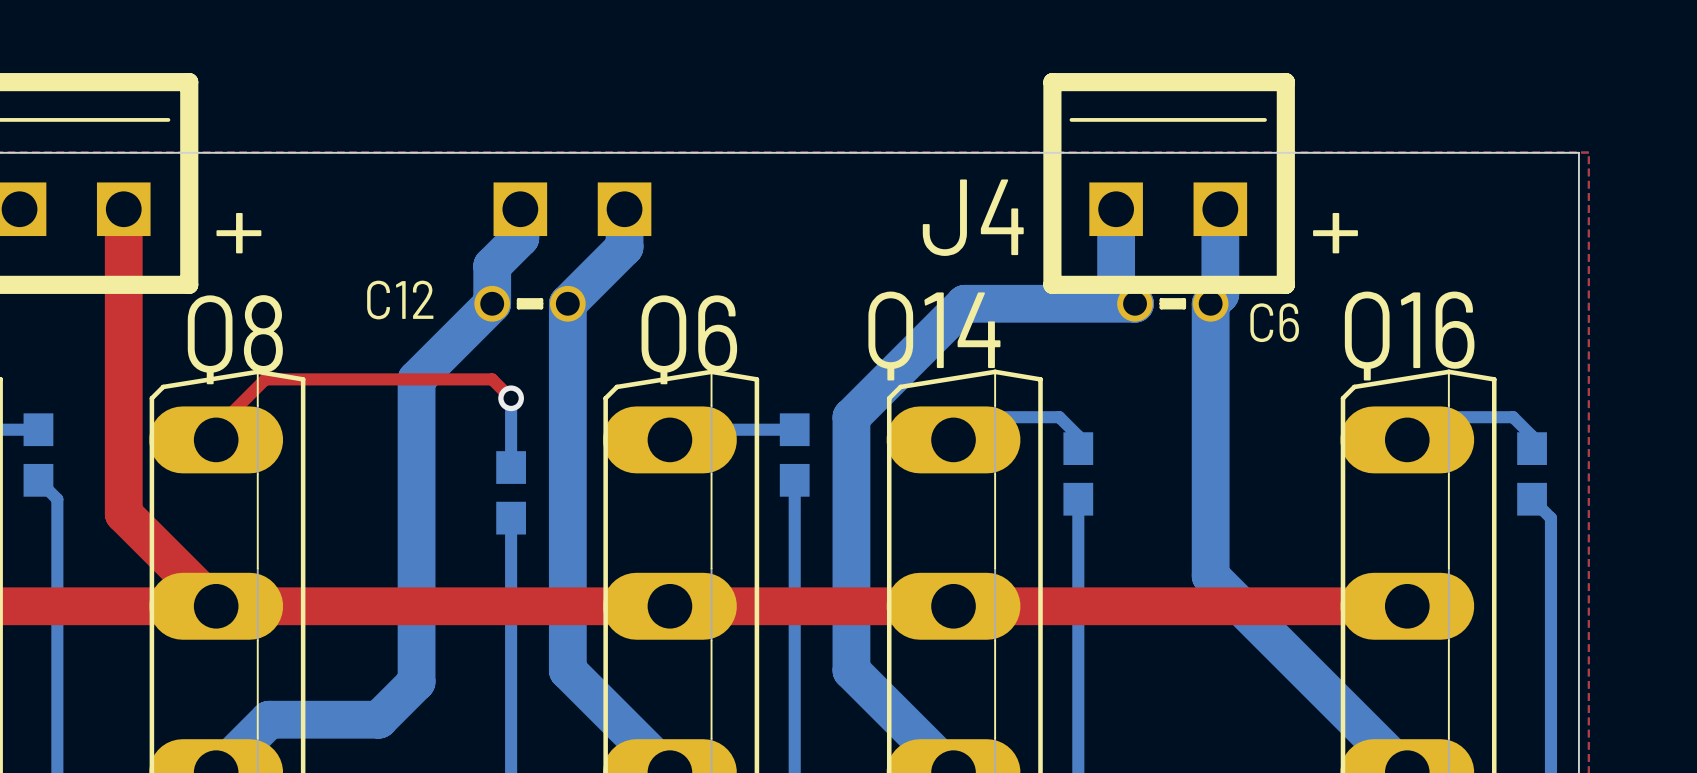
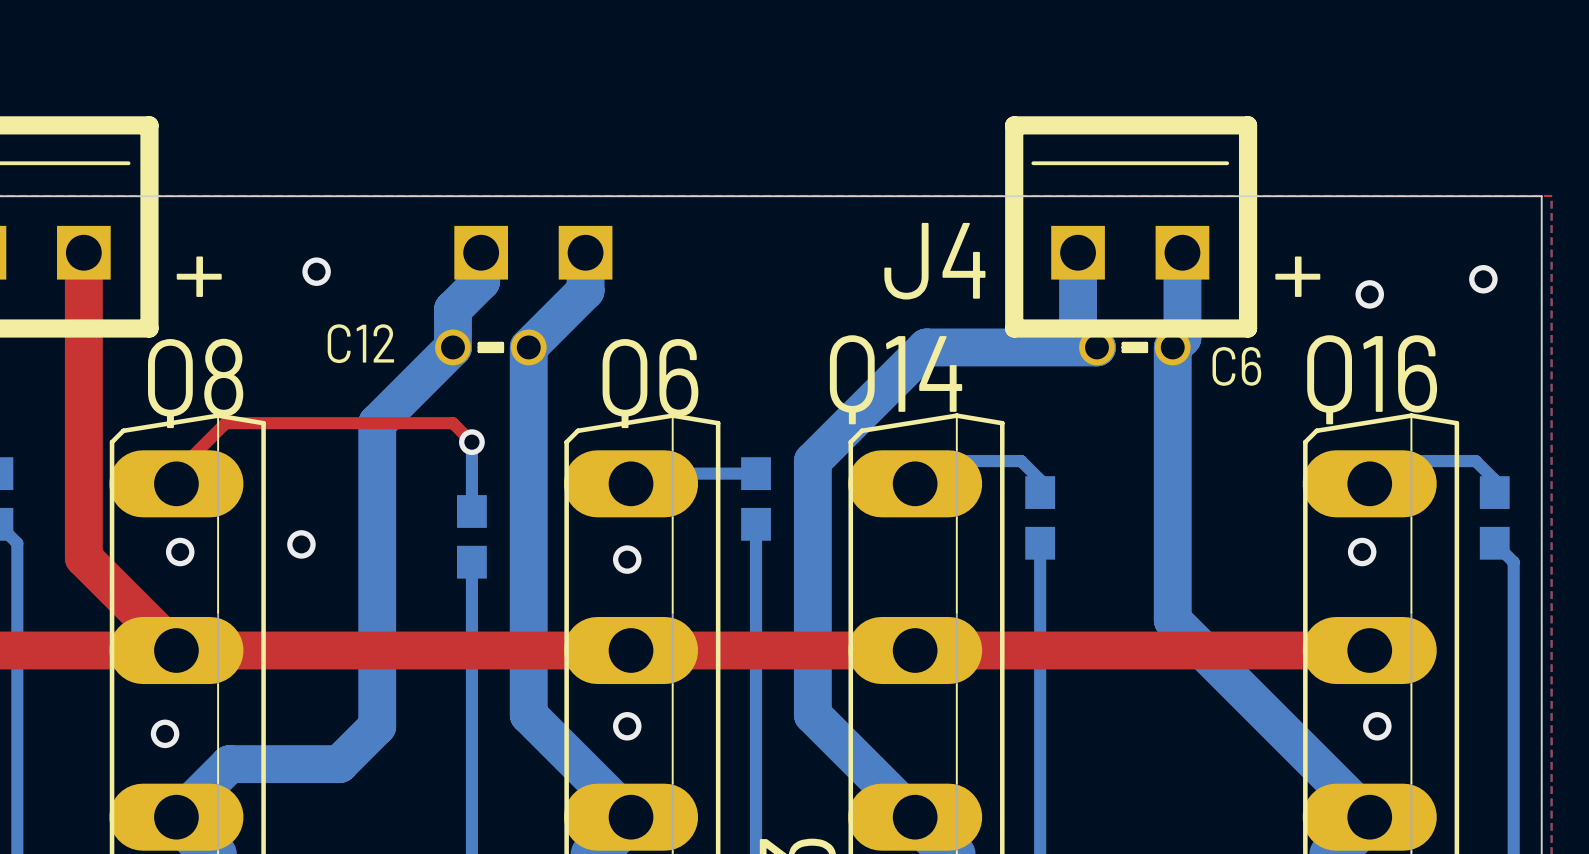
via: none -> (316, 271)
via: none -> (1483, 279)
via: none -> (1369, 294)
via: none -> (301, 544)
via: none -> (180, 552)
via: none -> (1362, 552)
via: none -> (627, 559)
via: none -> (627, 726)
via: none -> (1377, 726)
via: none -> (165, 733)

